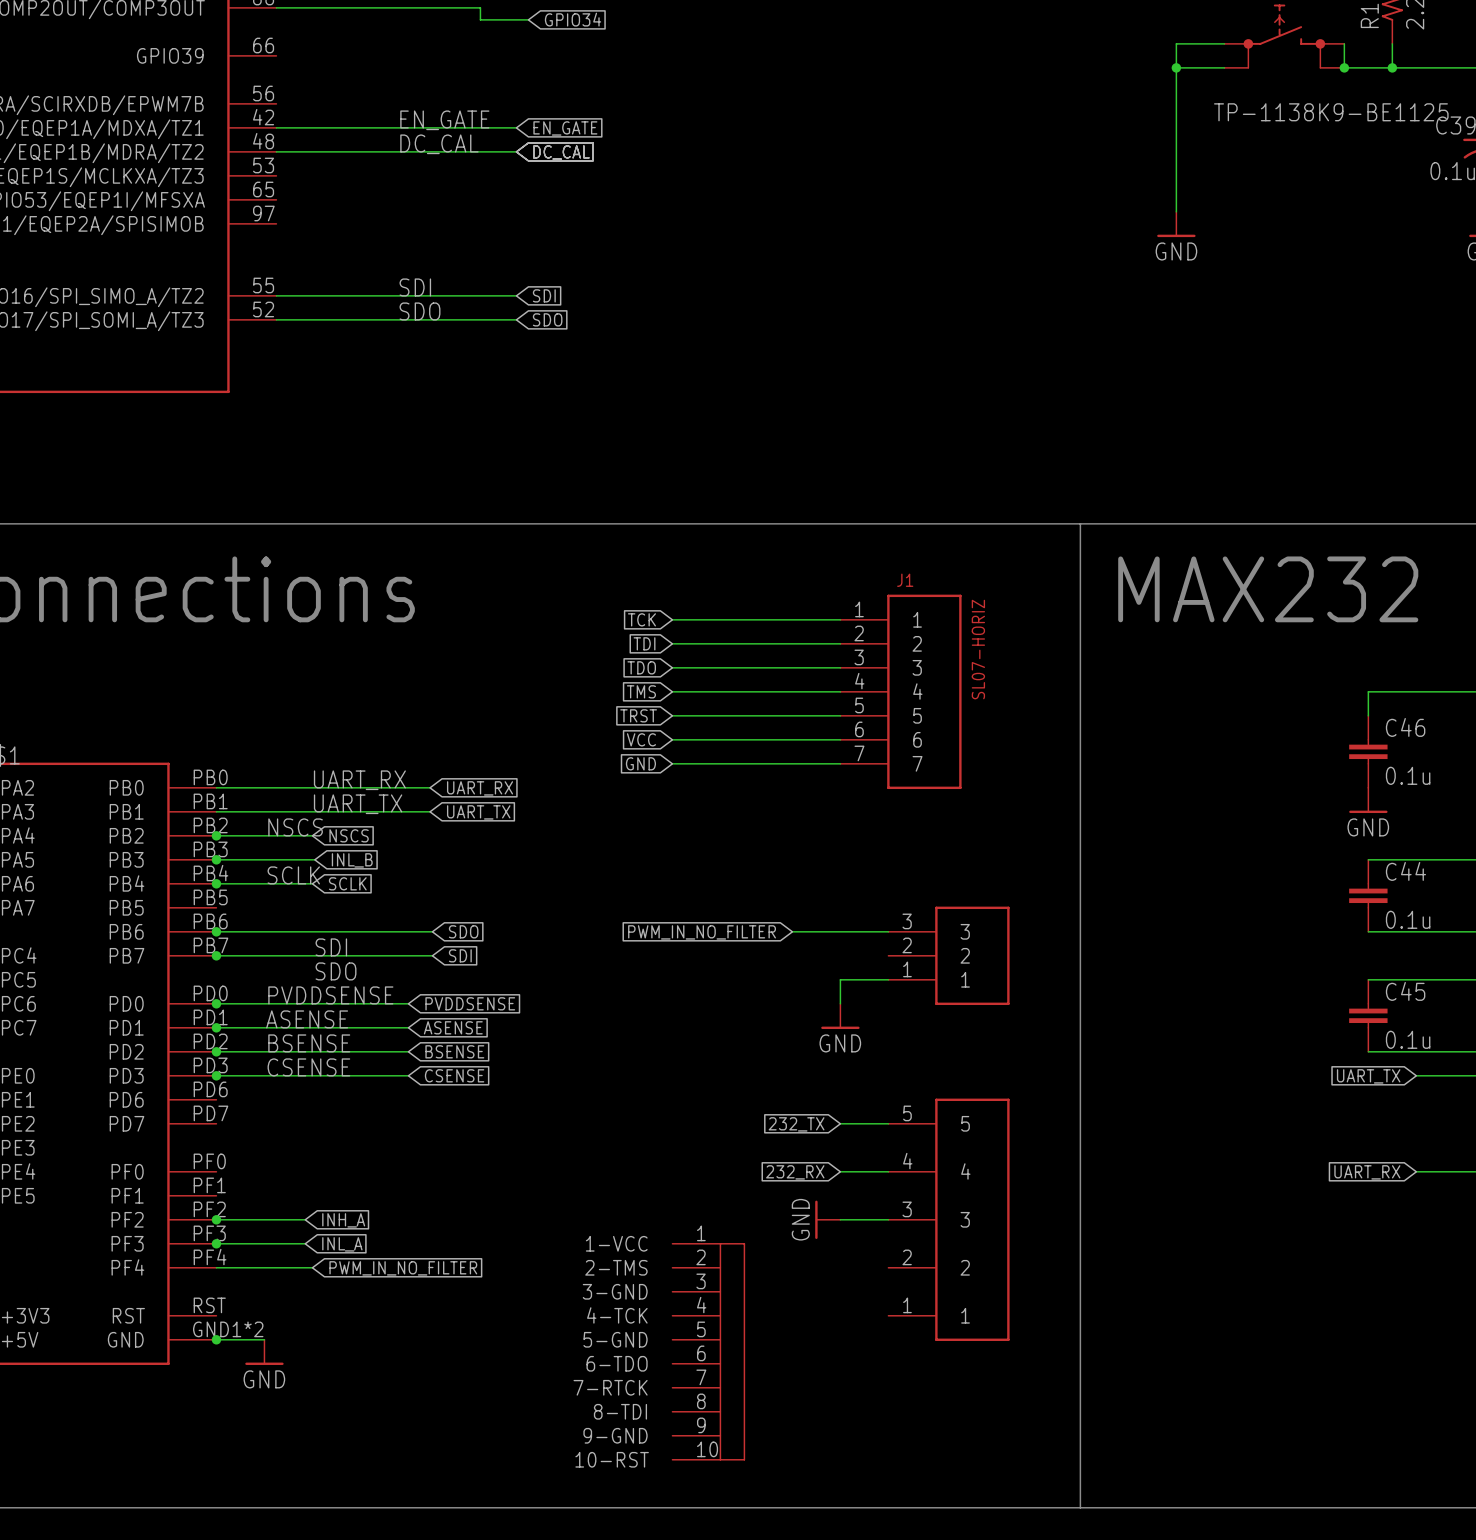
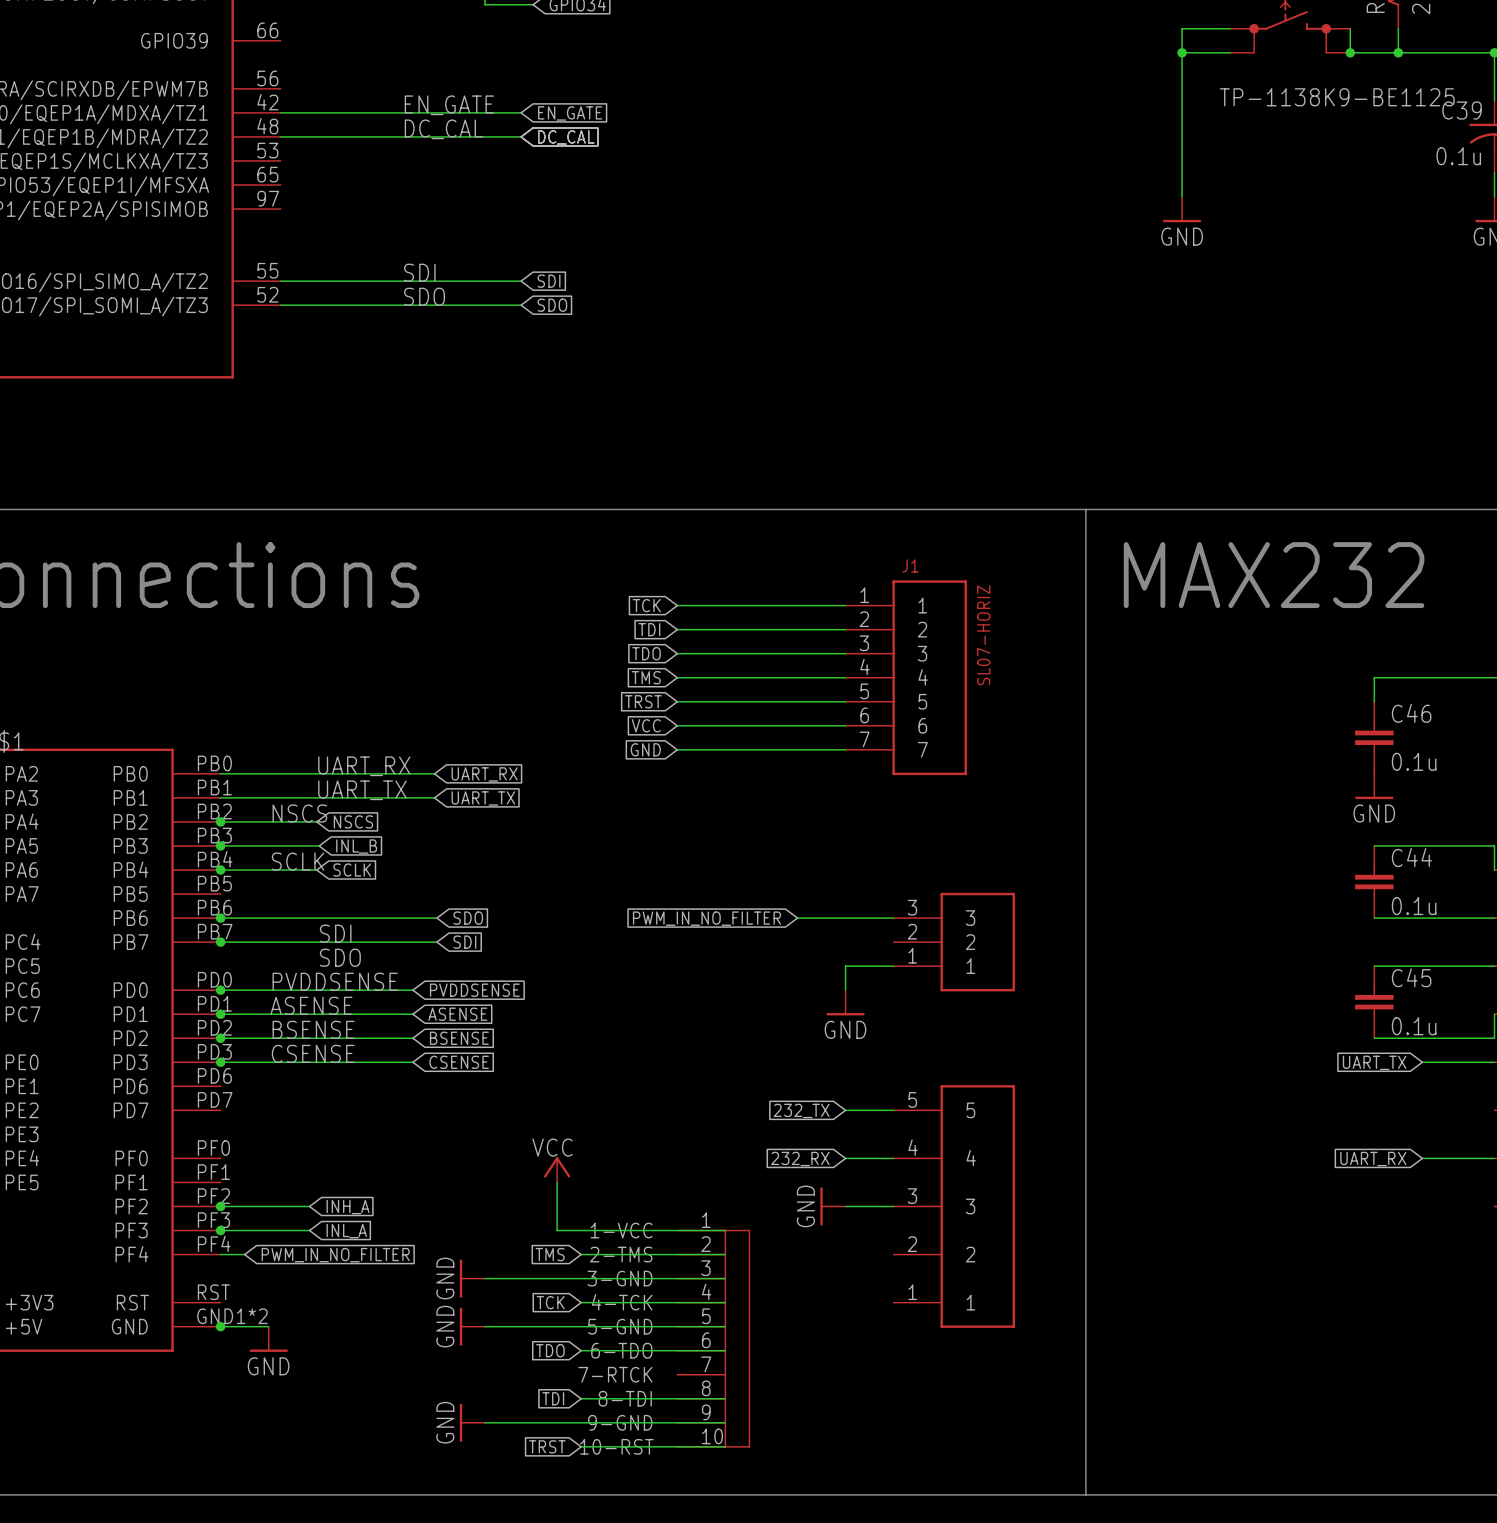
power symbol: none -> VCC (557, 1169)
wire: none -> (557, 1182) (557, 1230) (725, 1230)
wire: (240, 1267) (312, 1267) -> none
global label: none -> TMS (550, 1254)
wire: none -> (581, 1254) (725, 1254)
global label position: PWM_IN_NO_FILTER (403, 1268) -> PWM_IN_NO_FILTER (335, 1255)
power symbol: none -> GND (472, 1278)
wire: none -> (485, 1278) (725, 1278)
global label: none -> TCK (550, 1302)
wire: none -> (581, 1302) (725, 1302)
power symbol: none -> GND (472, 1326)
wire: none -> (485, 1326) (725, 1326)
global label: none -> TDO (550, 1350)
wire: none -> (581, 1350) (725, 1350)
global label: none -> TDI (553, 1398)
wire: none -> (581, 1398) (725, 1398)
power symbol: none -> GND (472, 1422)
wire: none -> (485, 1422) (725, 1422)
global label: none -> TRST (547, 1446)
wire: none -> (581, 1446) (725, 1446)

